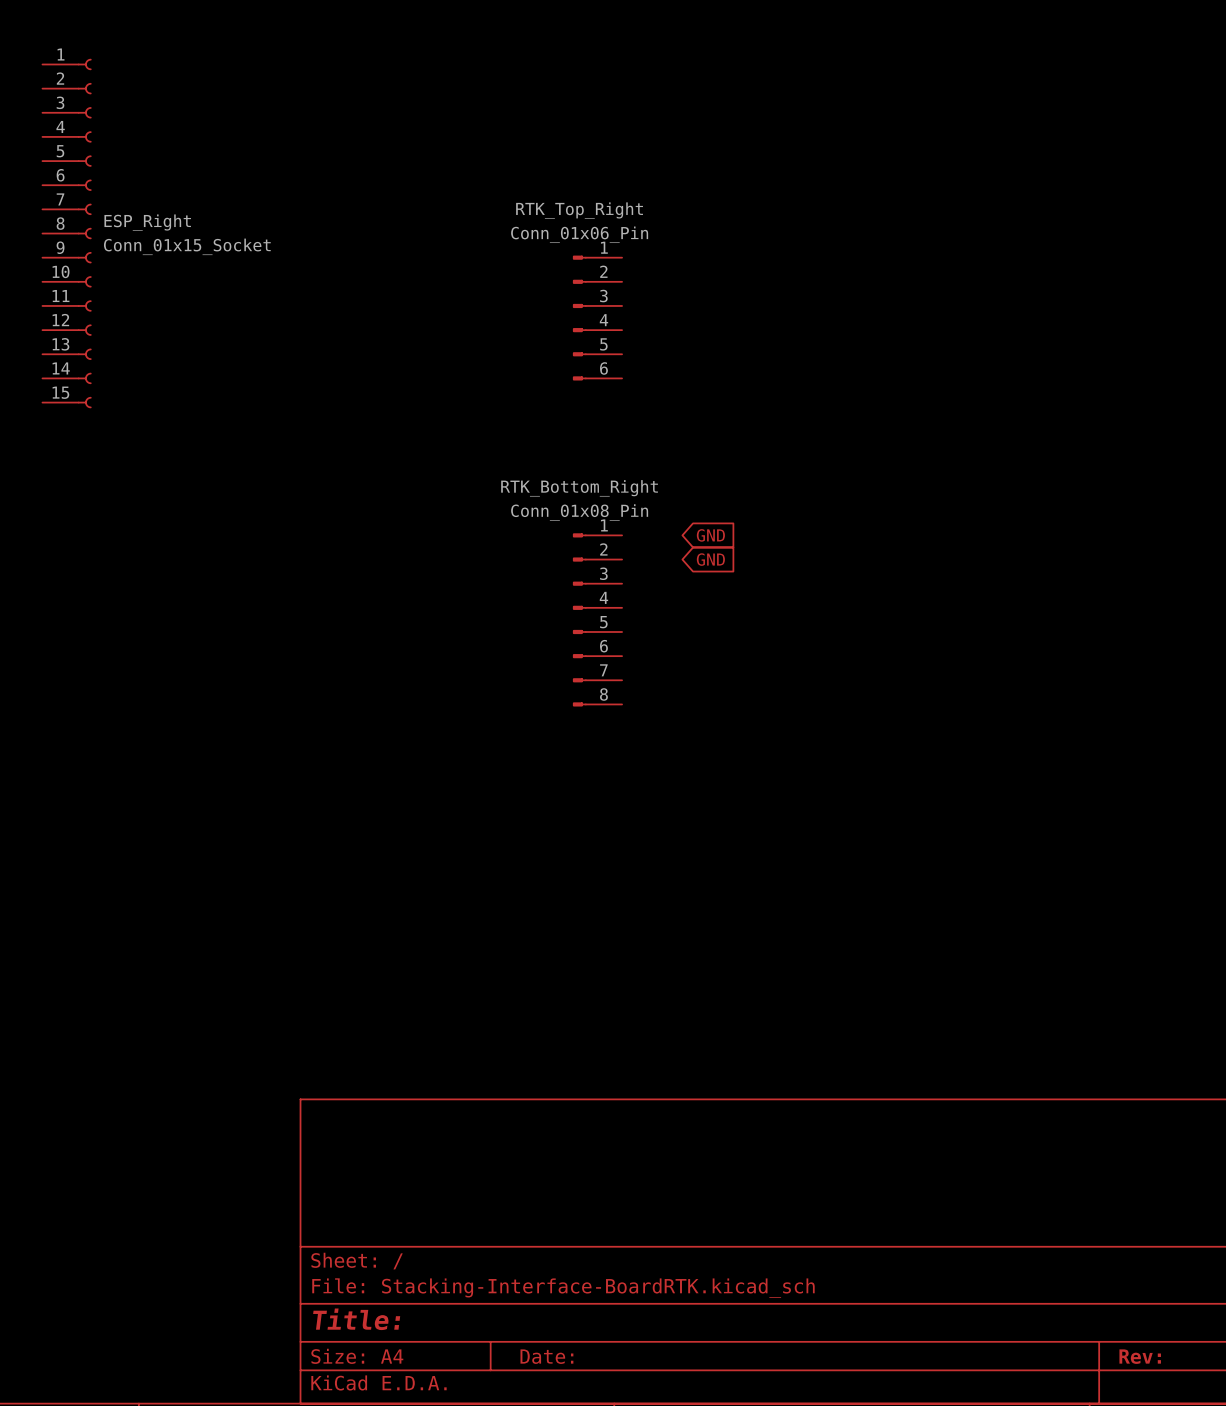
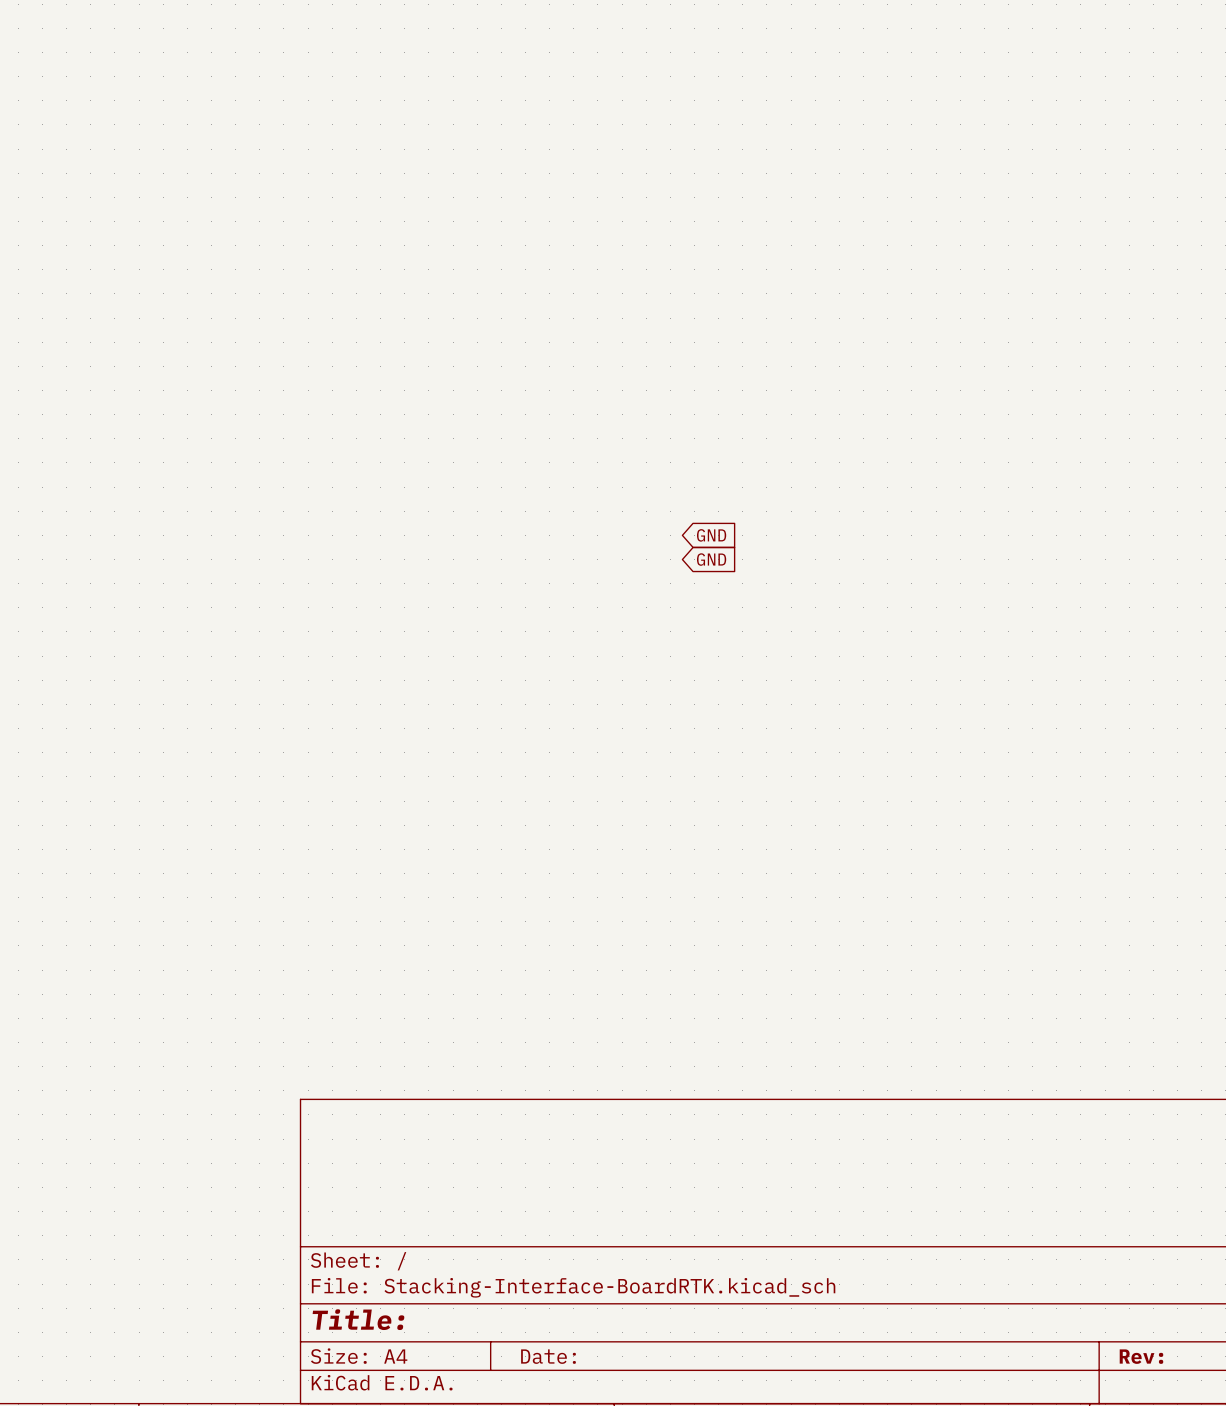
ESP_Right: Conn_01x15_Socket (66, 233) -> none
RTK_Top_Right: Conn_01x06_Pin (597, 318) -> none
RTK_Bottom_Right: Conn_01x08_Pin (597, 619) -> none

